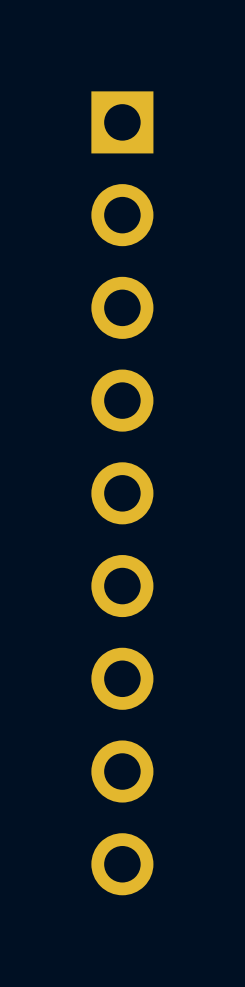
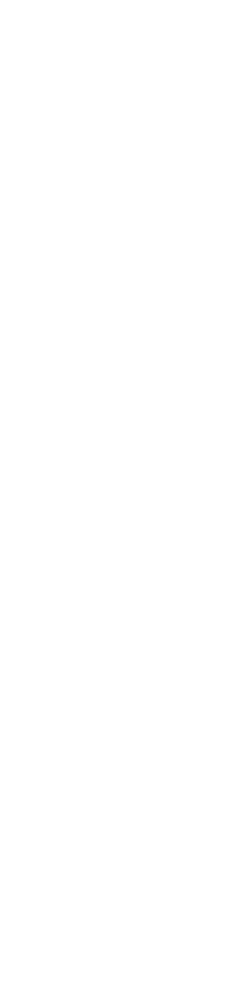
part: (122, 493) -> none

